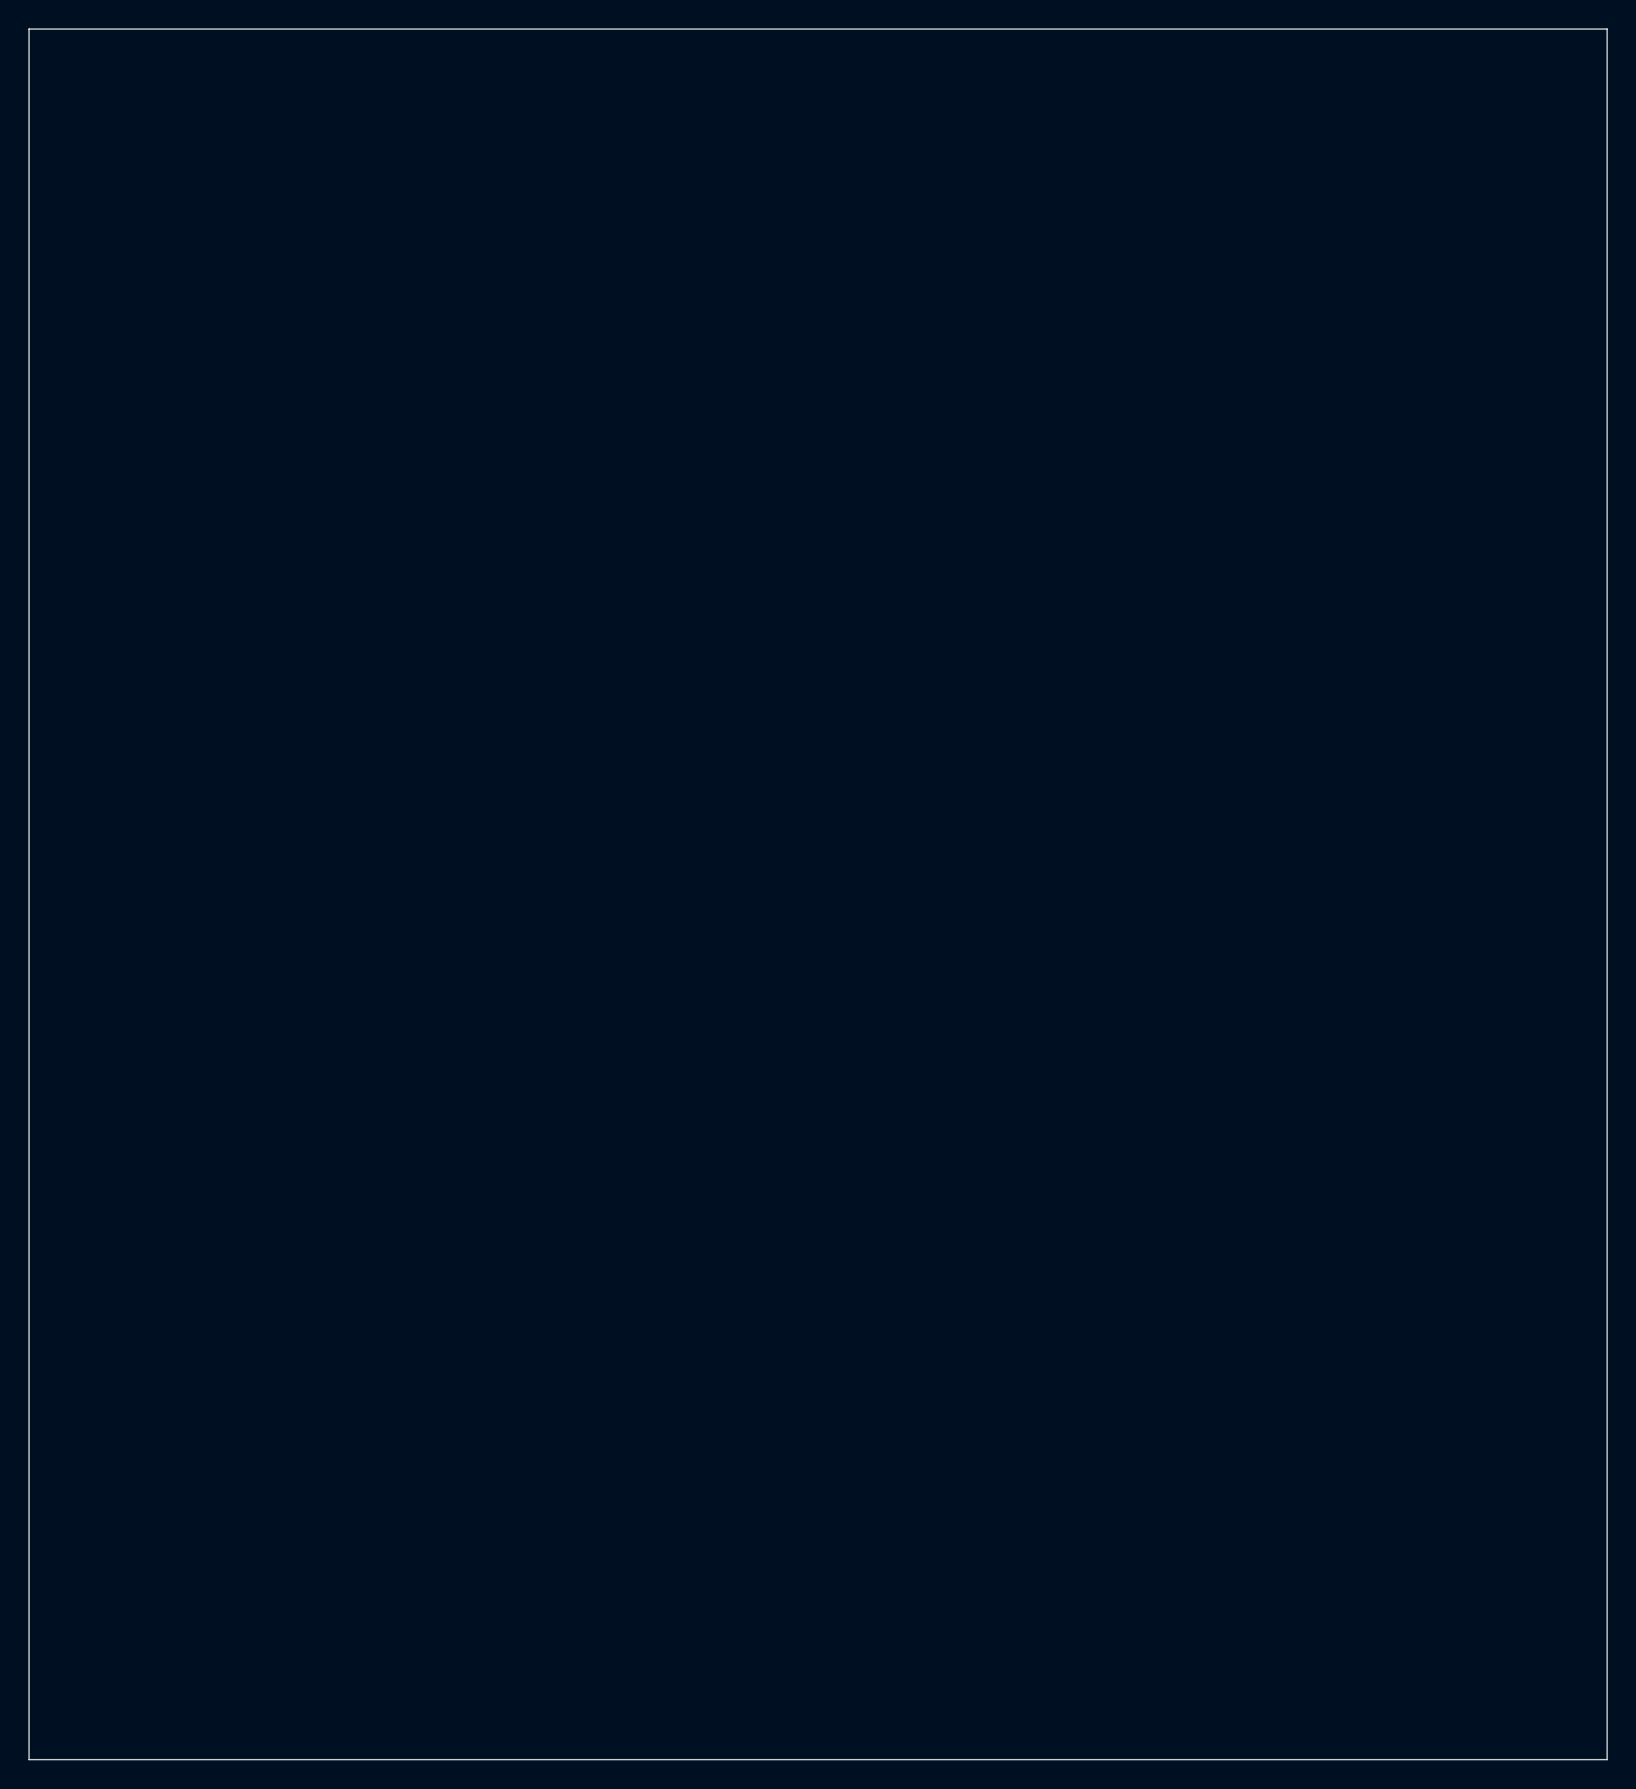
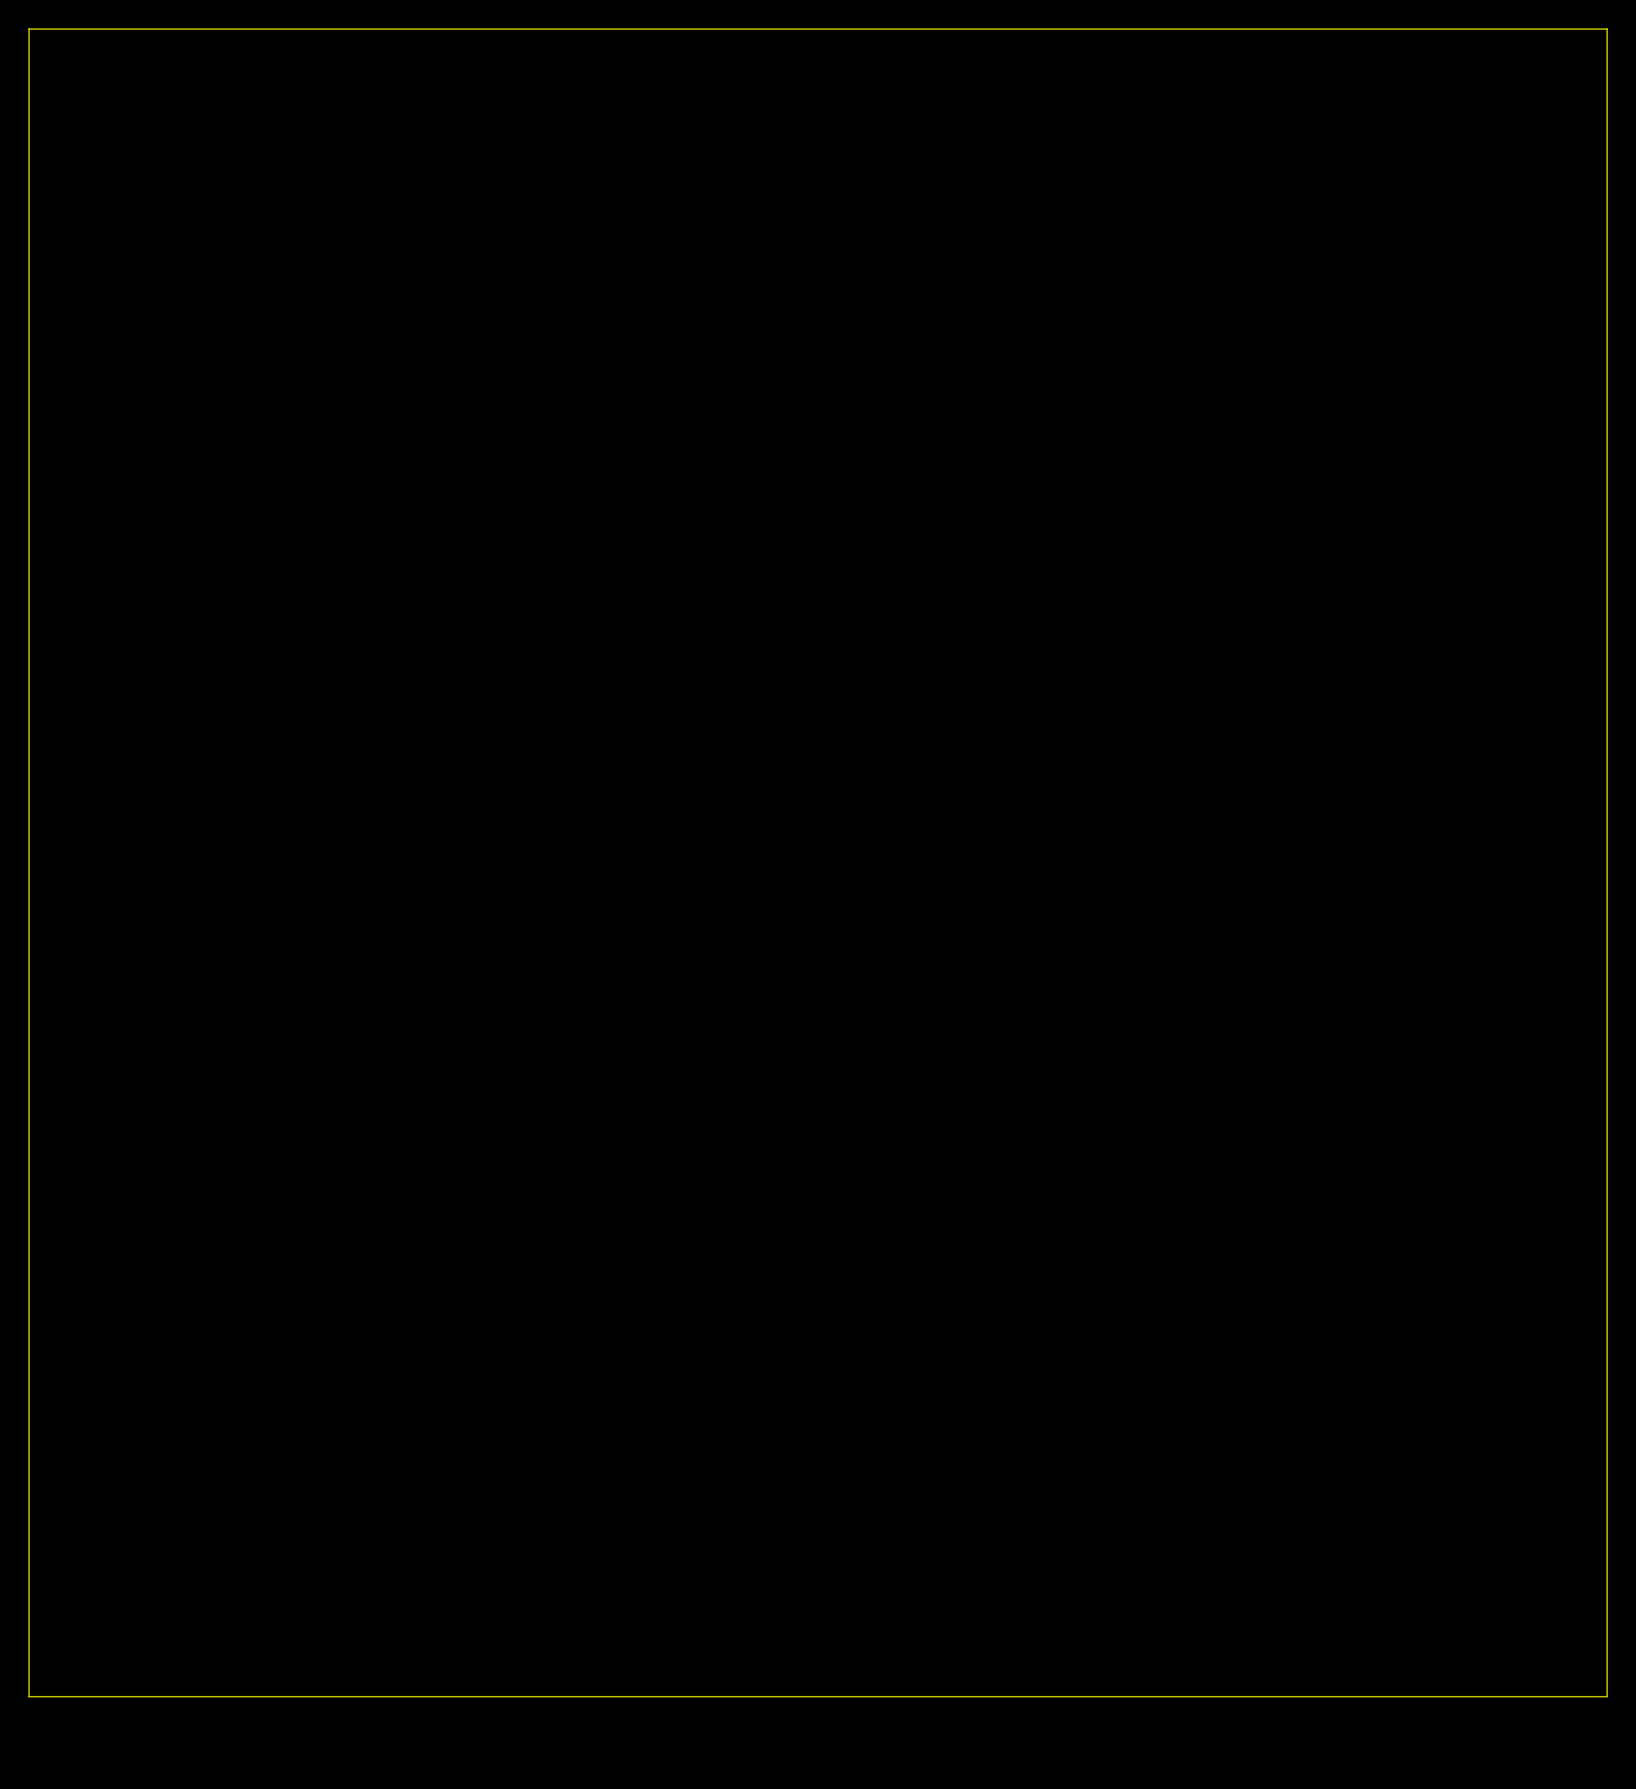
board edge: (29, 1696) (29, 1759) (1607, 1759) (1607, 1696) -> (29, 1696) (1607, 1696)

